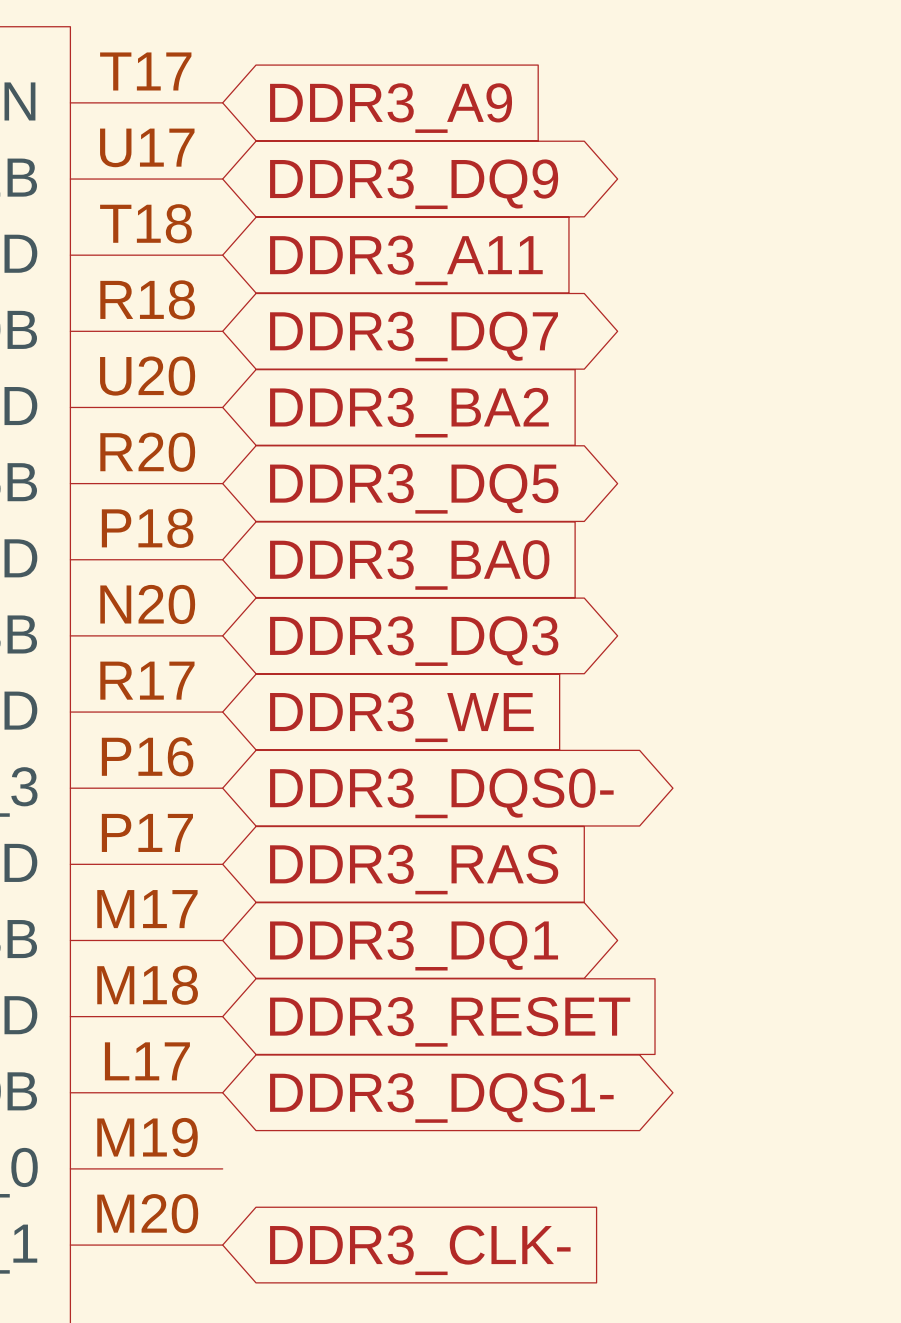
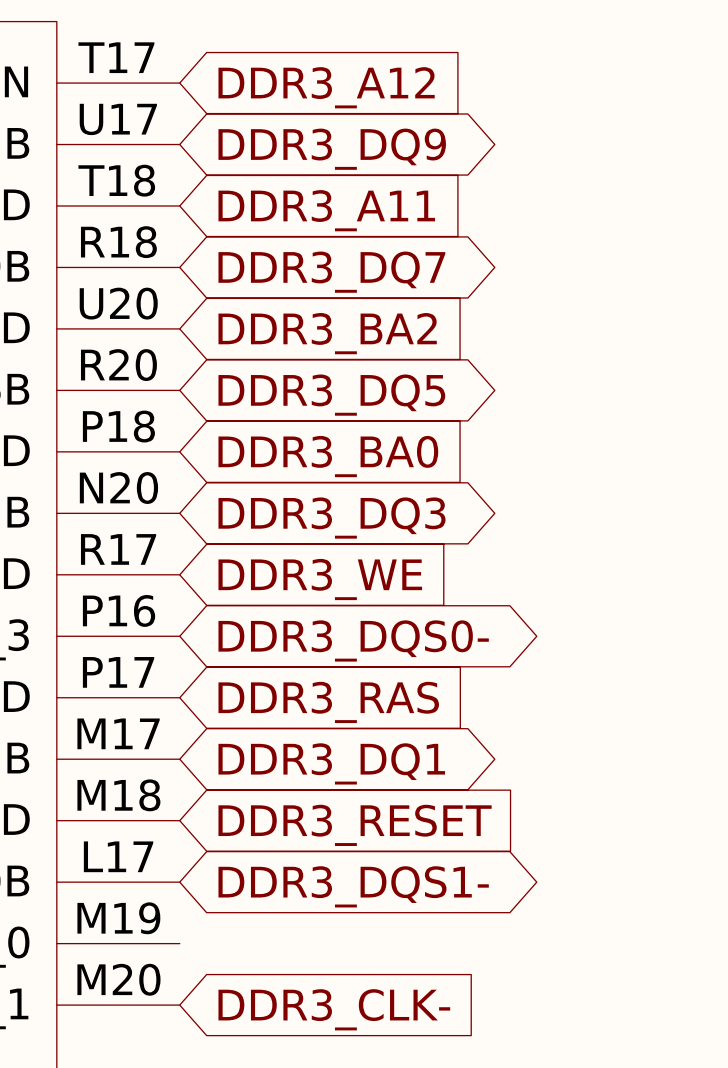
global label: DDR3_A9 (391, 108) -> DDR3_A12 (326, 87)

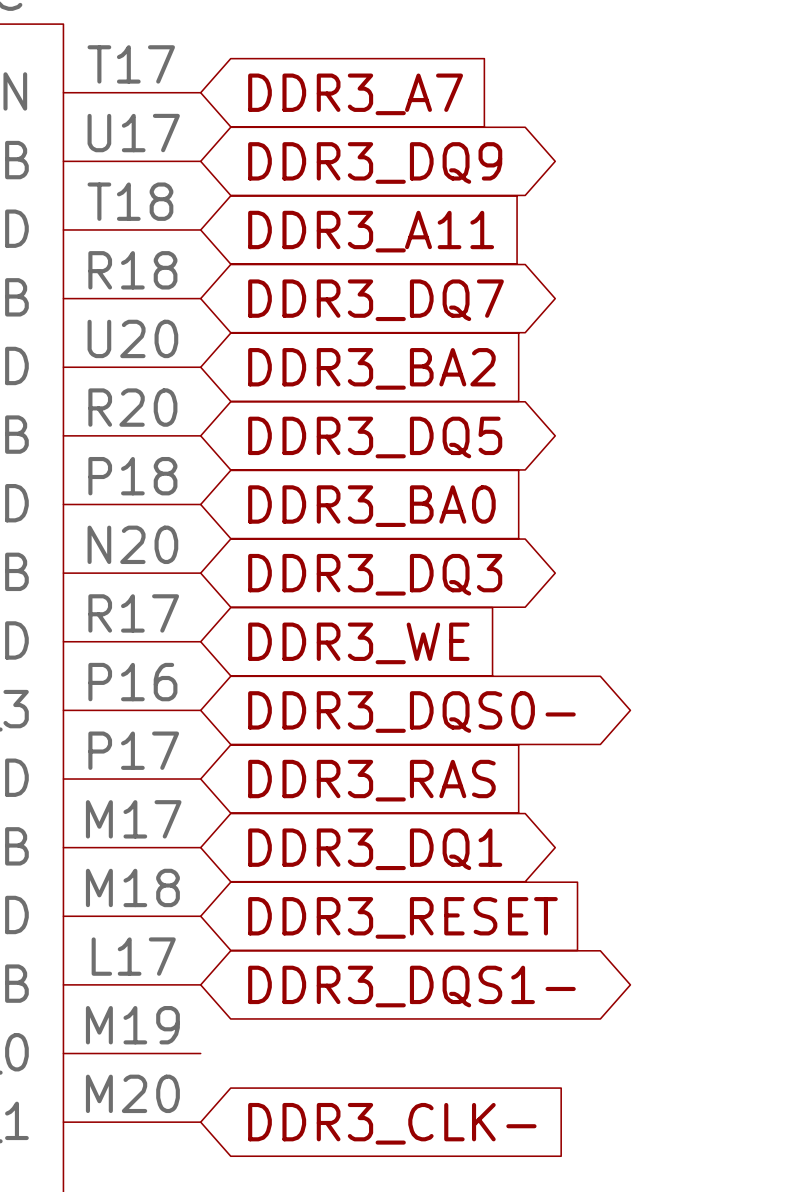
global label: DDR3_A12 (326, 87) -> DDR3_A7 (355, 94)

